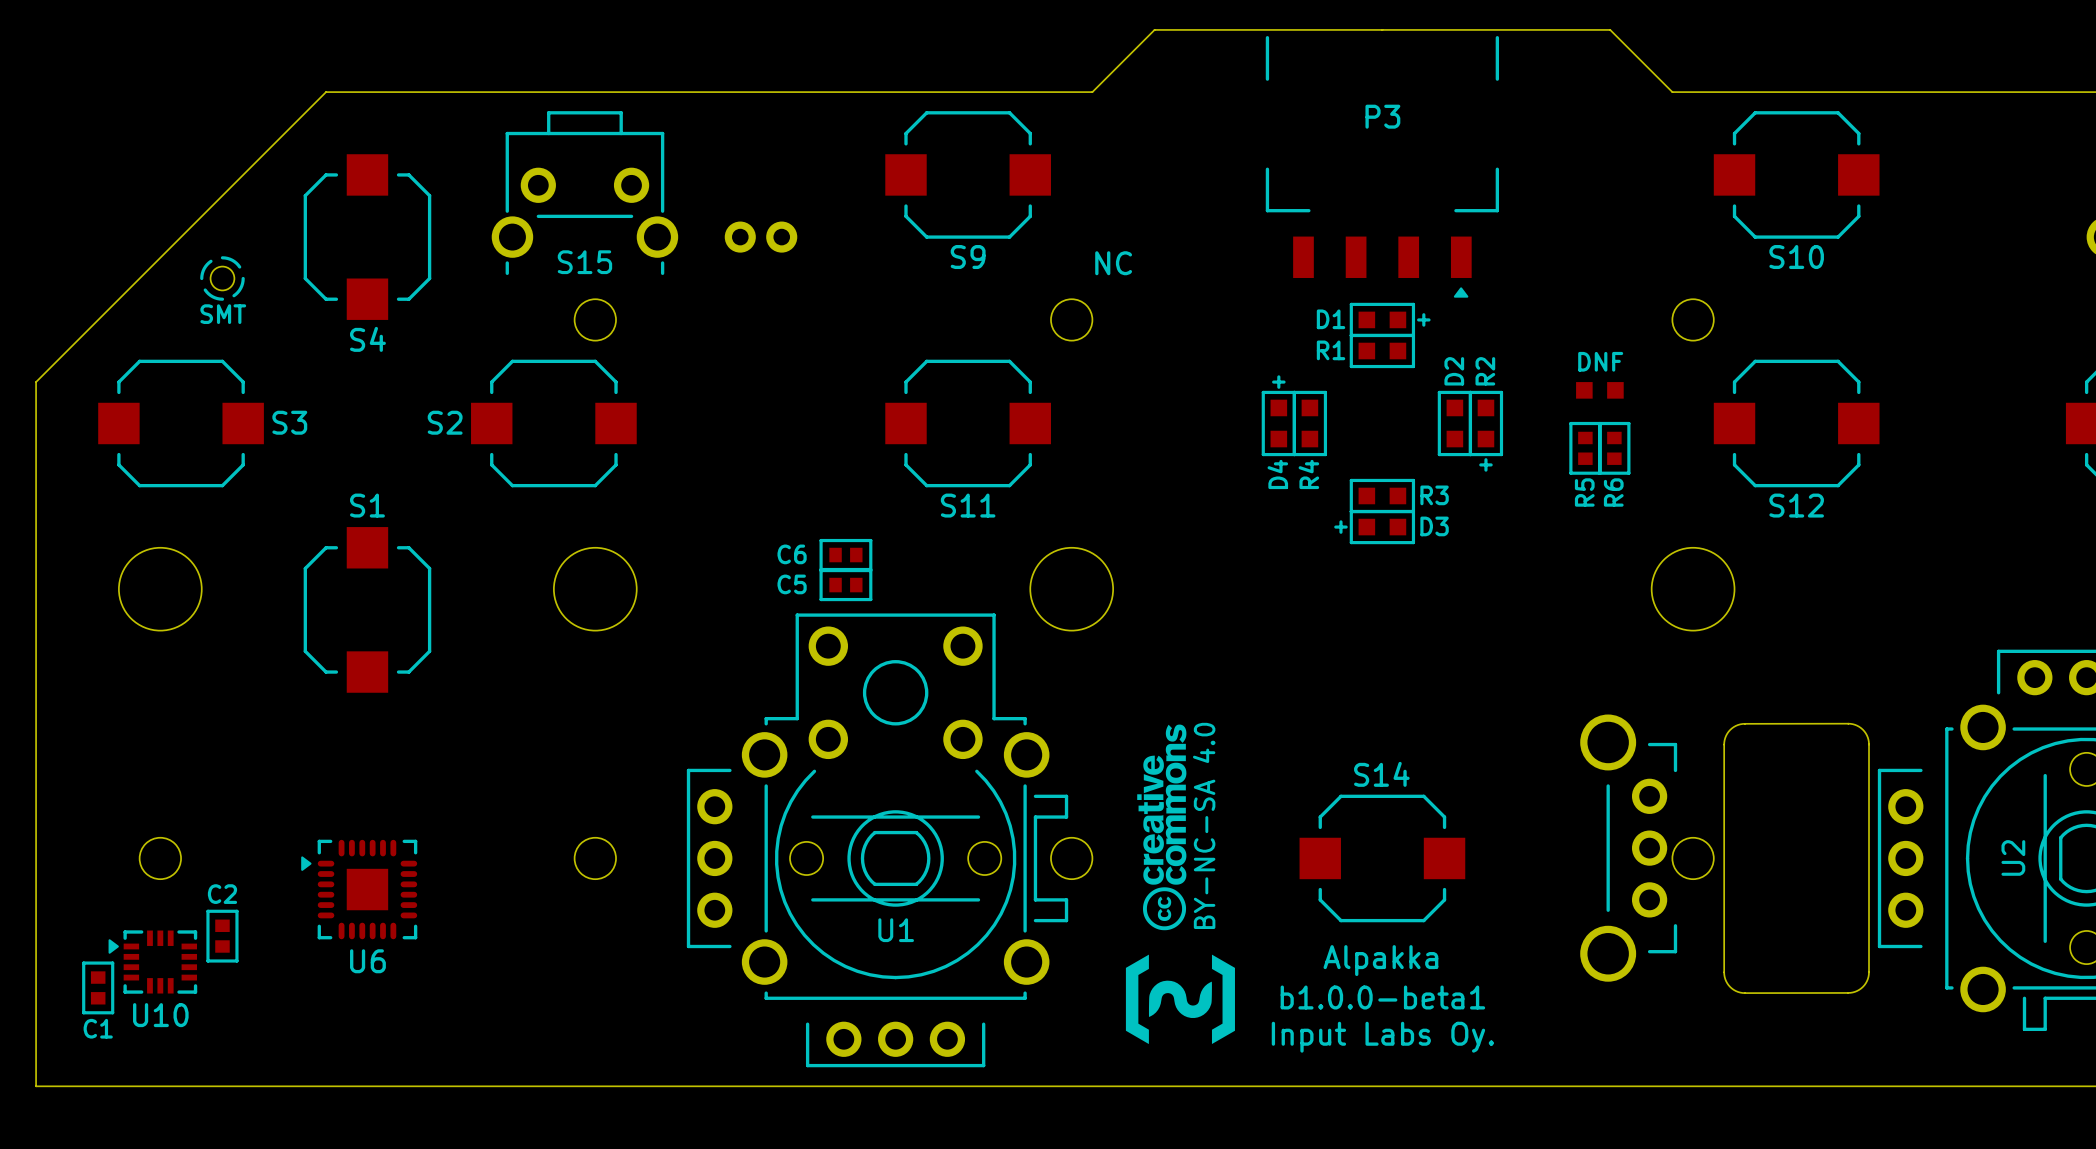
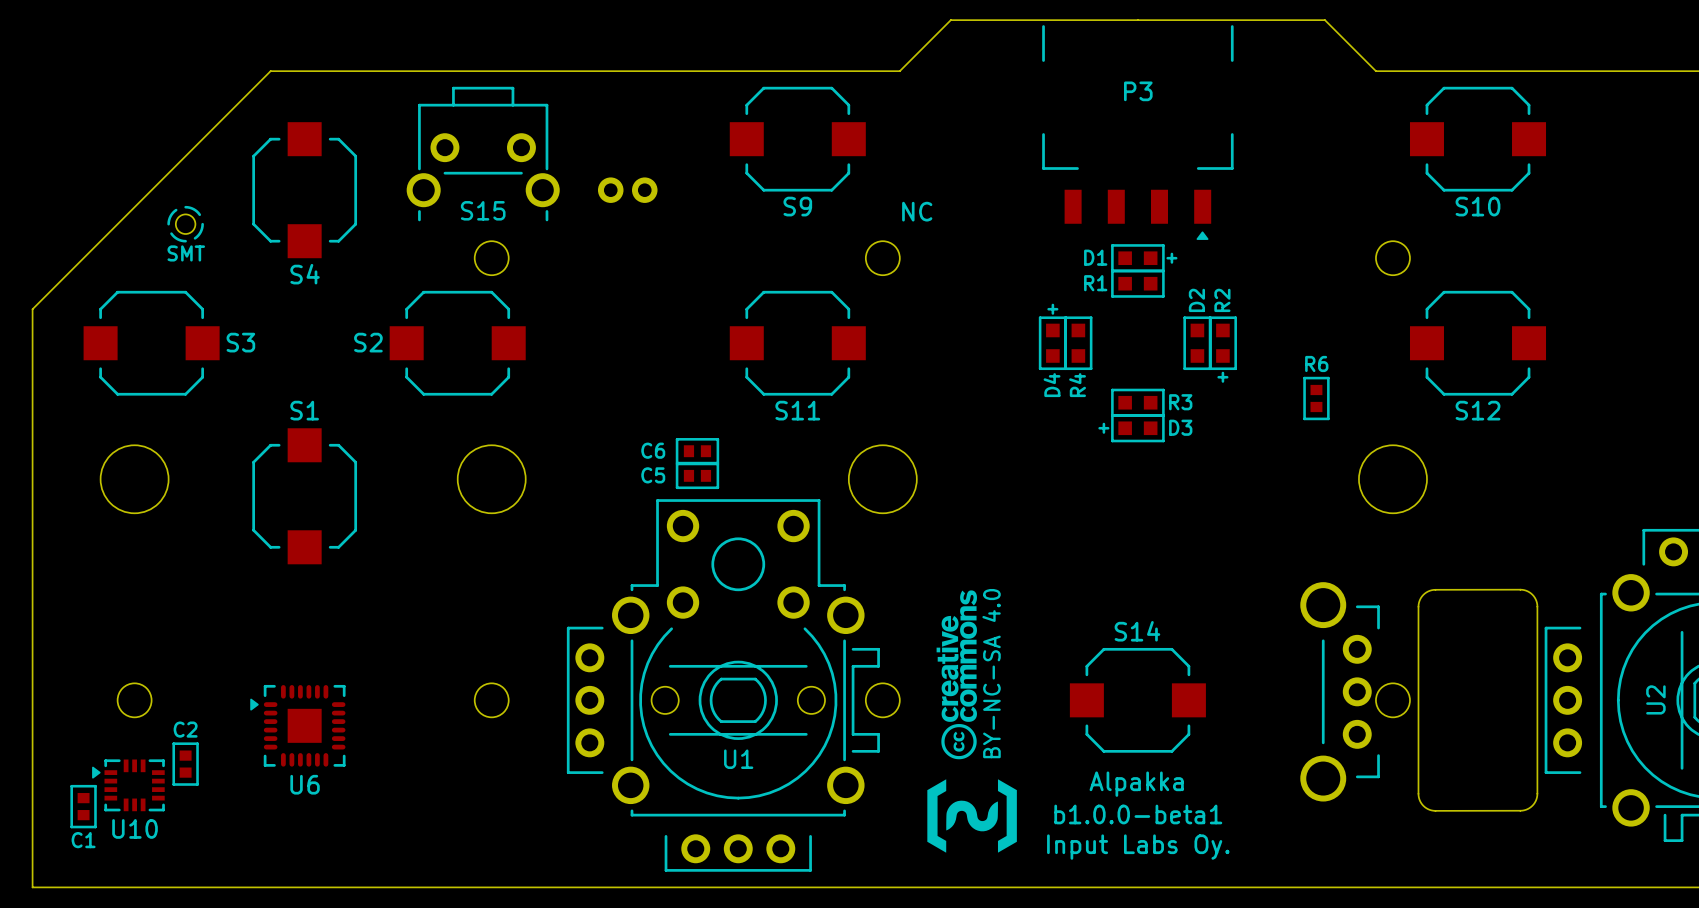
text: DNF (1600, 361) -> none
part: (1599, 390) -> none
R5: (1585, 448) -> none
R6 position: (1614, 448) -> (1316, 398)
R6 name rotation: 0° (1613, 492) -> 90° clockwise (1316, 363)
R6 name position: R6 (1613, 492) -> R6 (1316, 363)

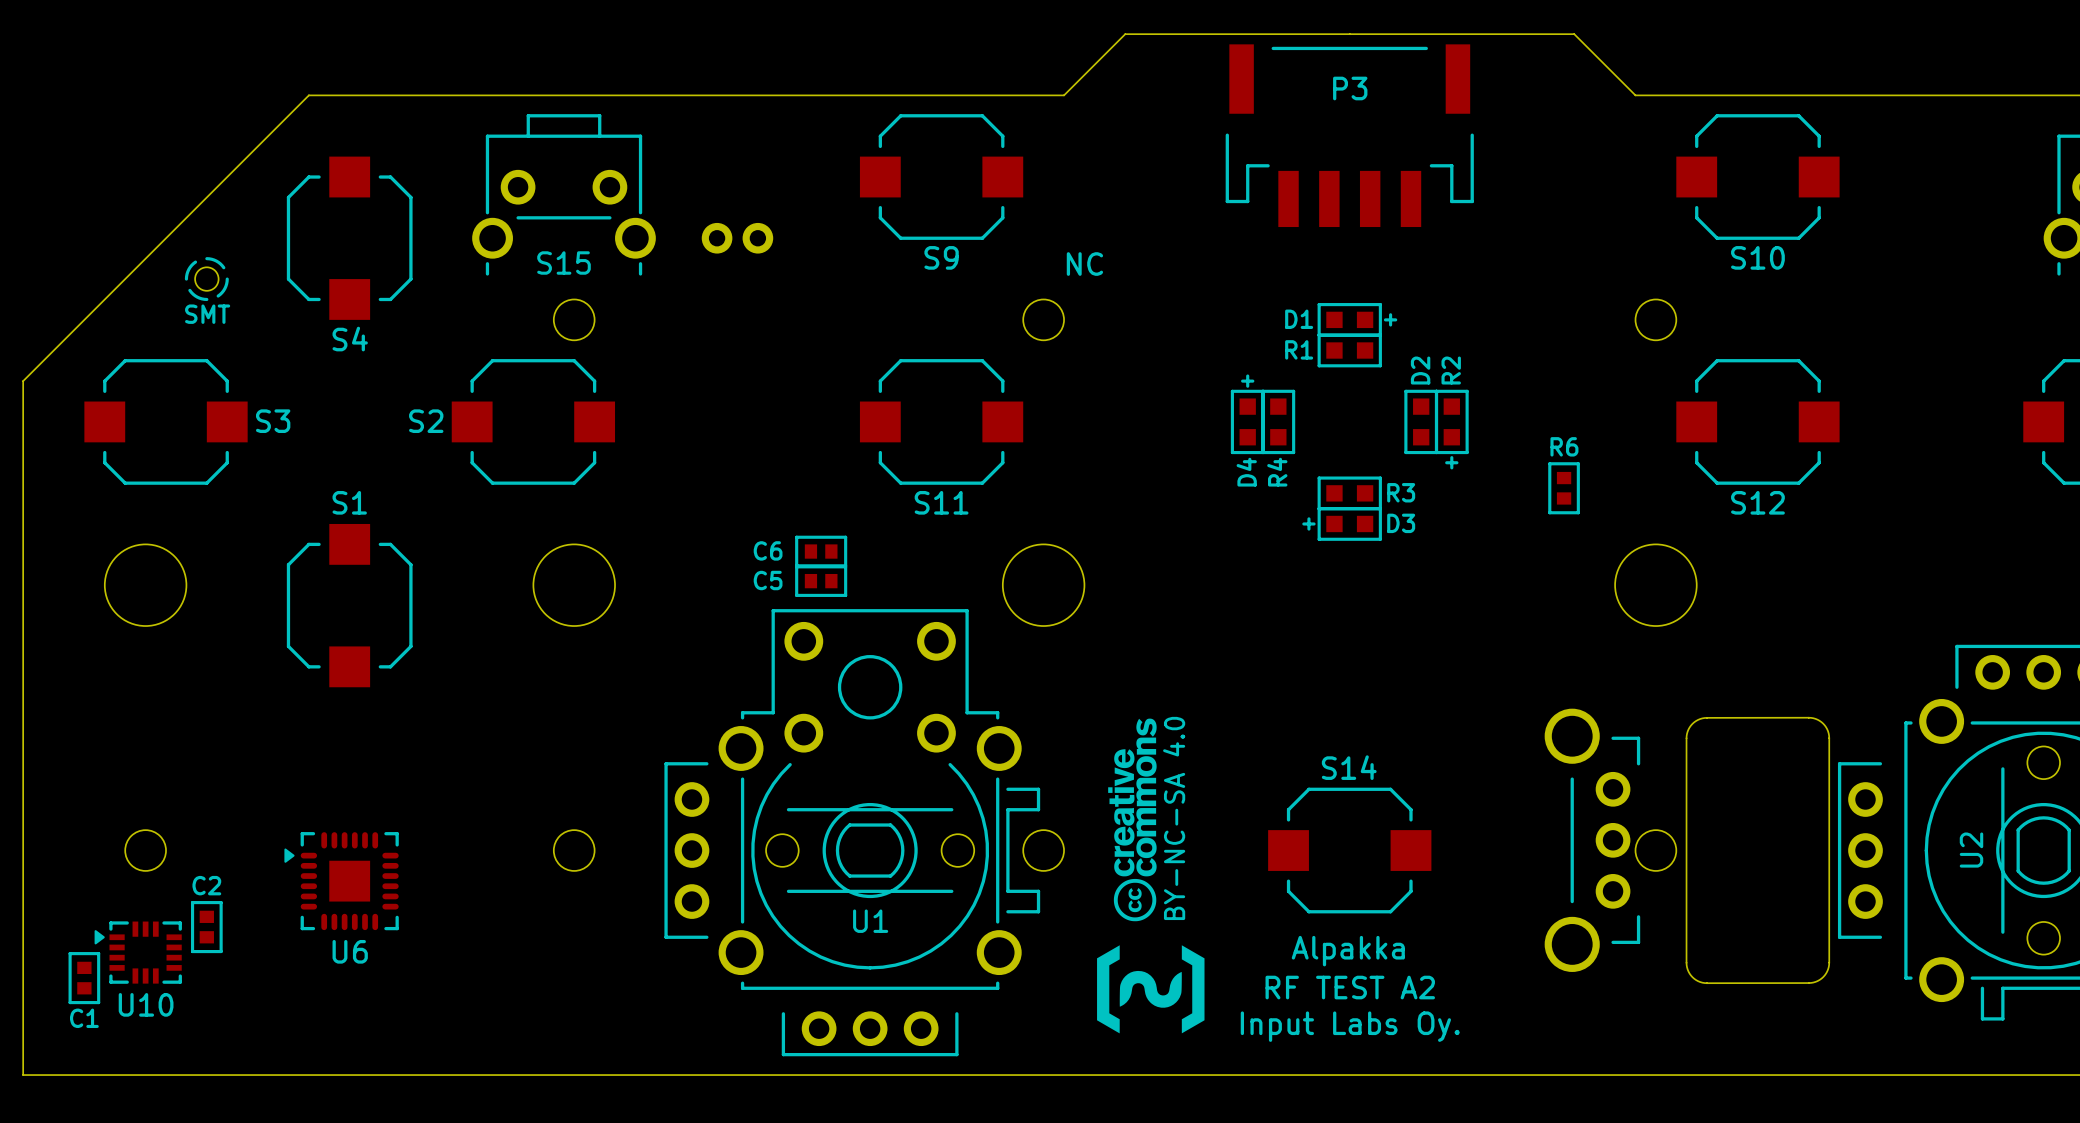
P3 footprint: [1042, 25, 1234, 240] -> [1225, 44, 1474, 228]
text: b1.0.0-beta1 (1138, 814) -> RF TEST A2 (1350, 987)

